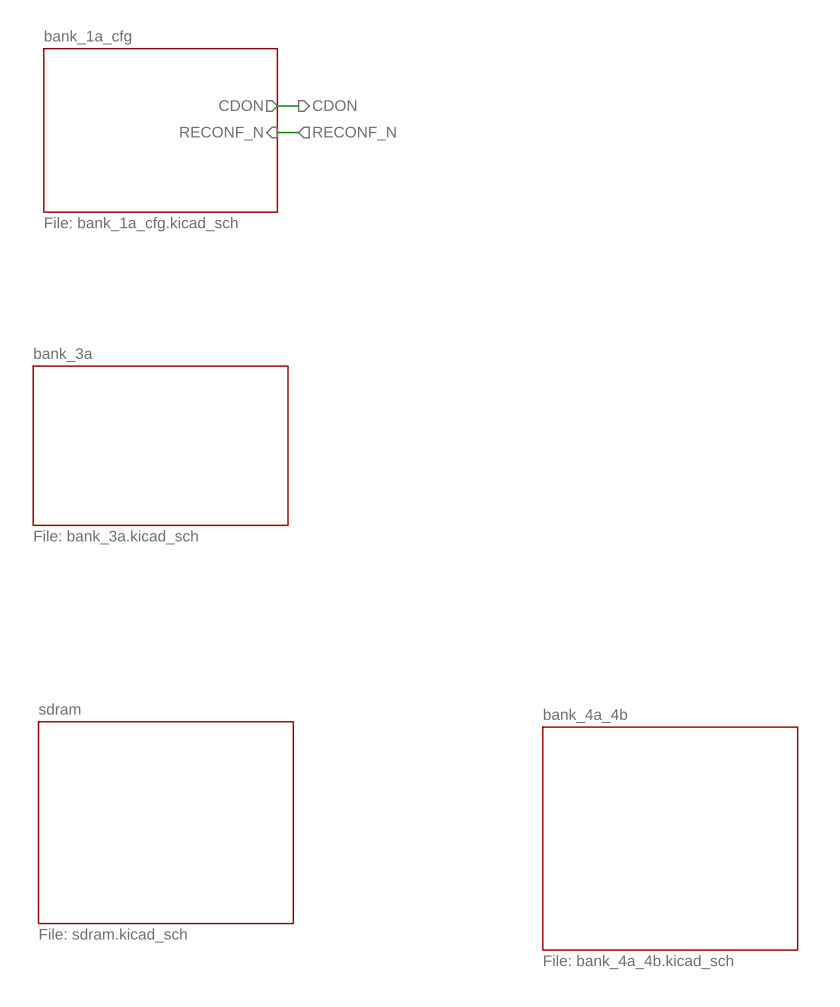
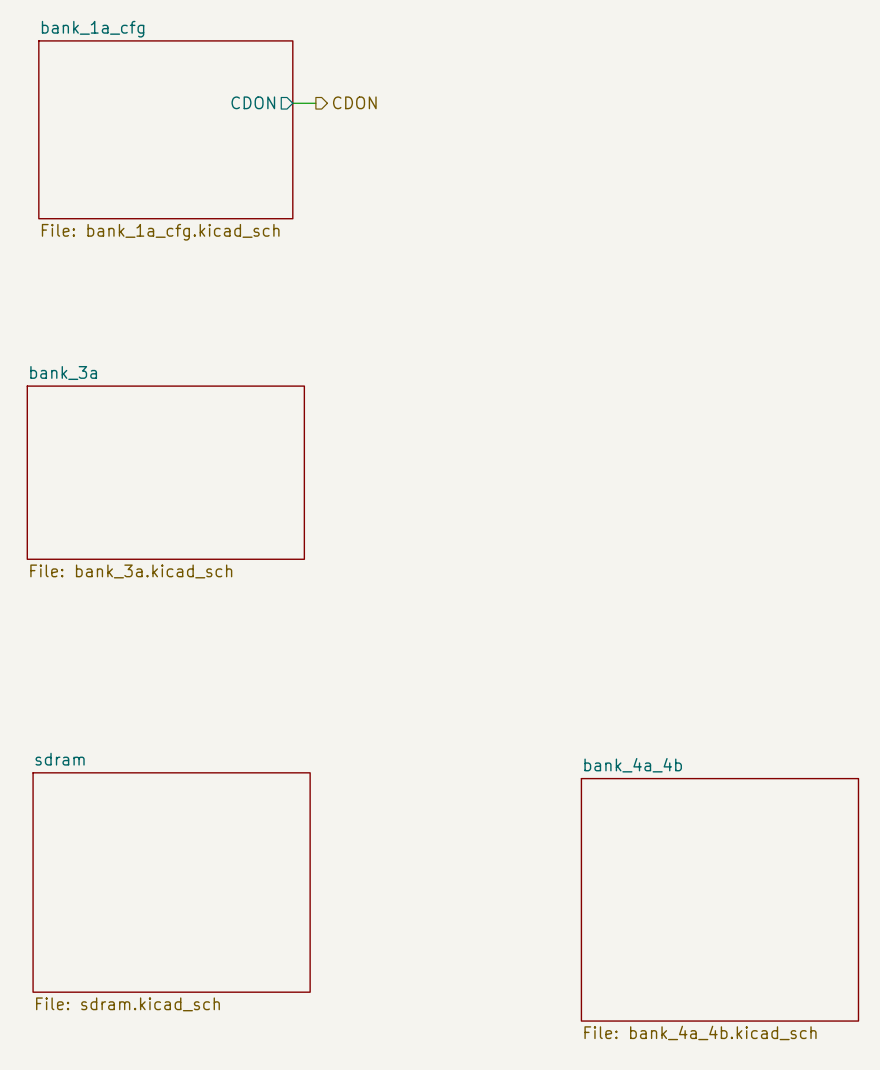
wire: (277, 132) (298, 132) -> none
sheet pin: RECONF_N (221, 133) -> none
hierarchical label: RECONF_N (354, 133) -> none

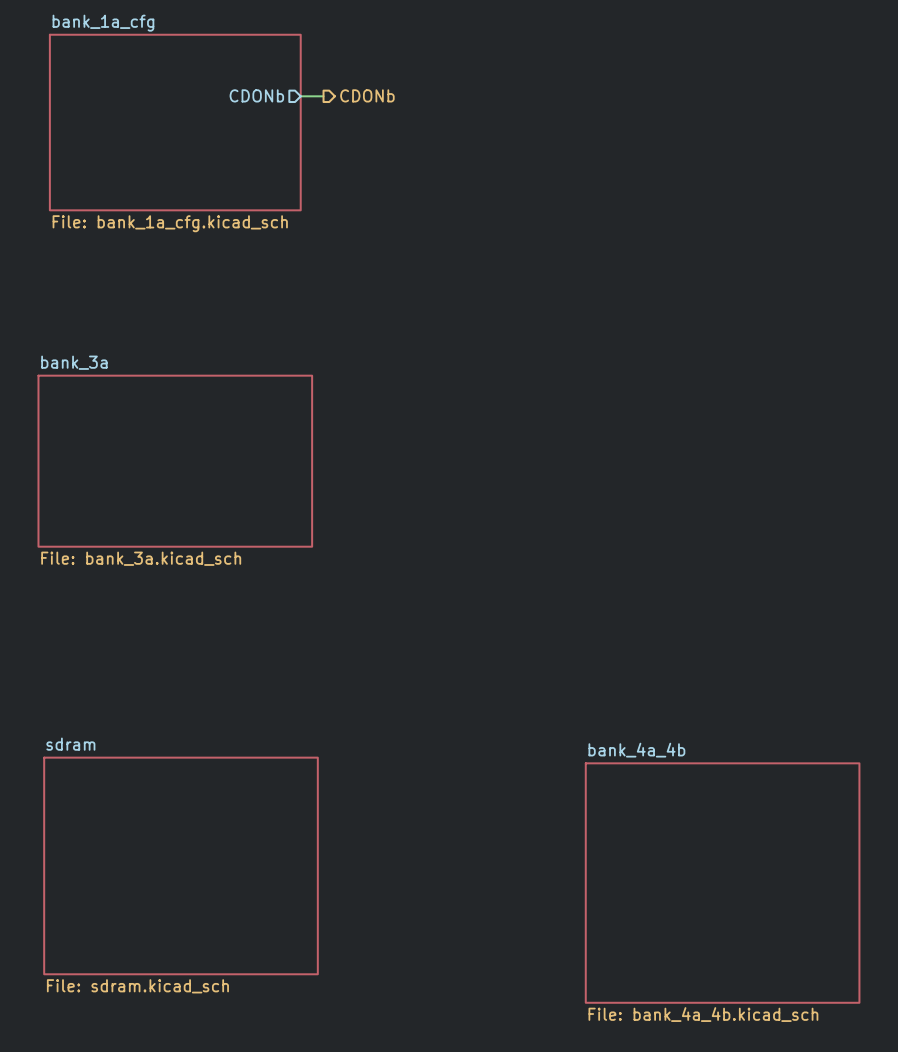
sheet pin: CDON (253, 102) -> CDONb (256, 95)
hierarchical label: CDON (354, 102) -> CDONb (367, 95)

